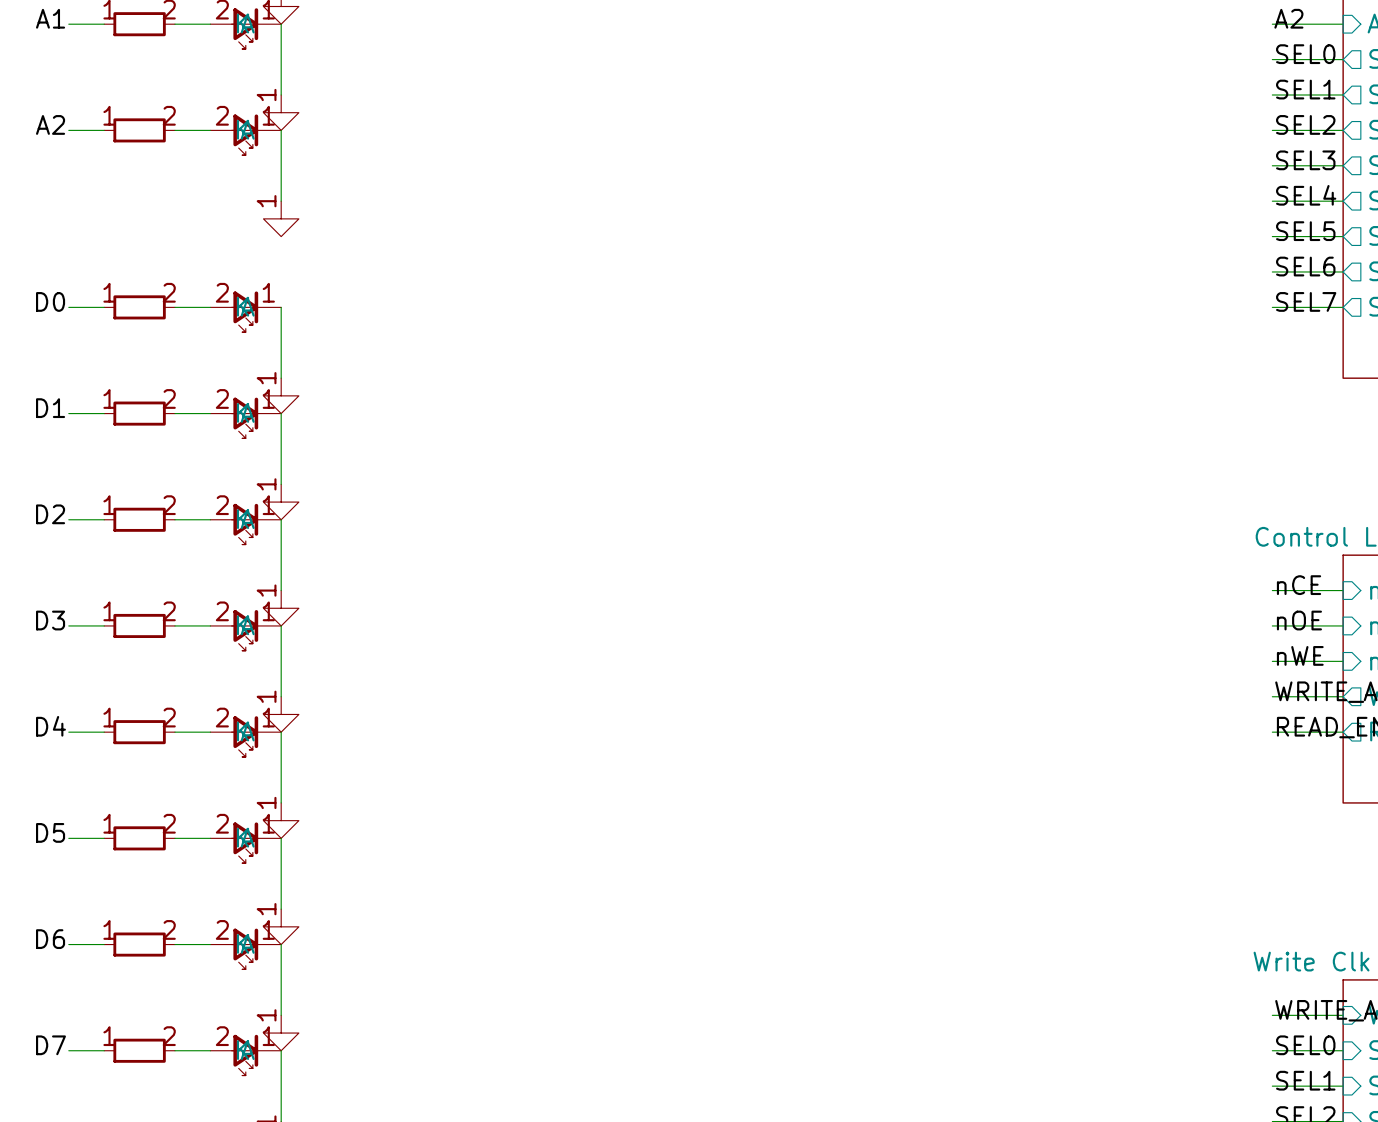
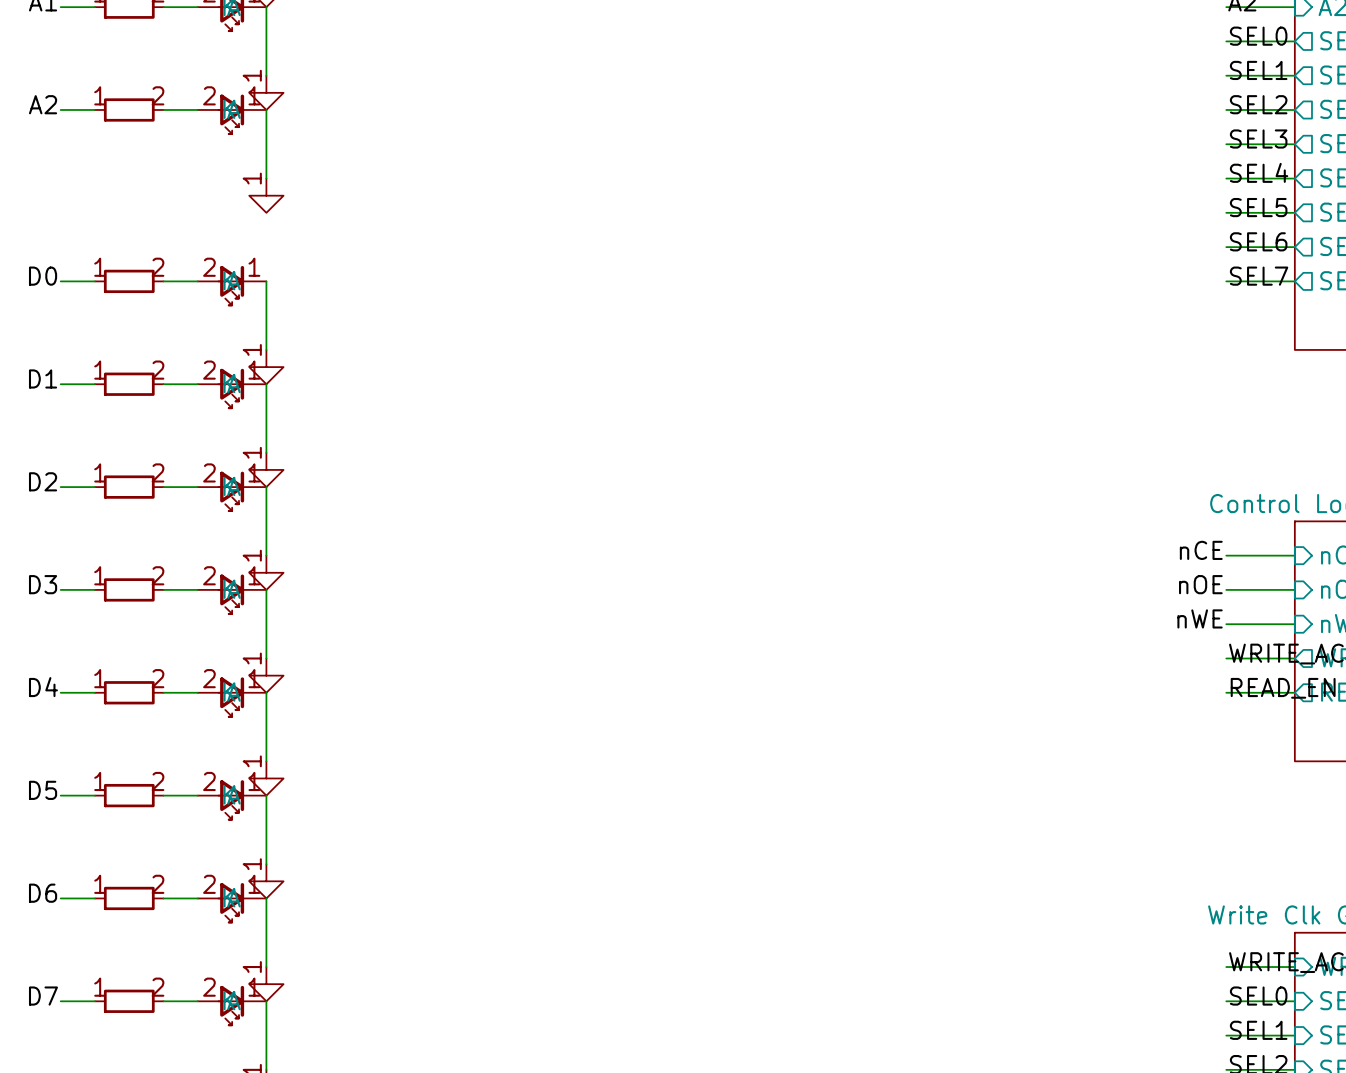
label position: nCE (1299, 585) -> nCE (1201, 550)
label position: nOE (1299, 620) -> nOE (1200, 584)
label position: nWE (1300, 655) -> nWE (1200, 618)

